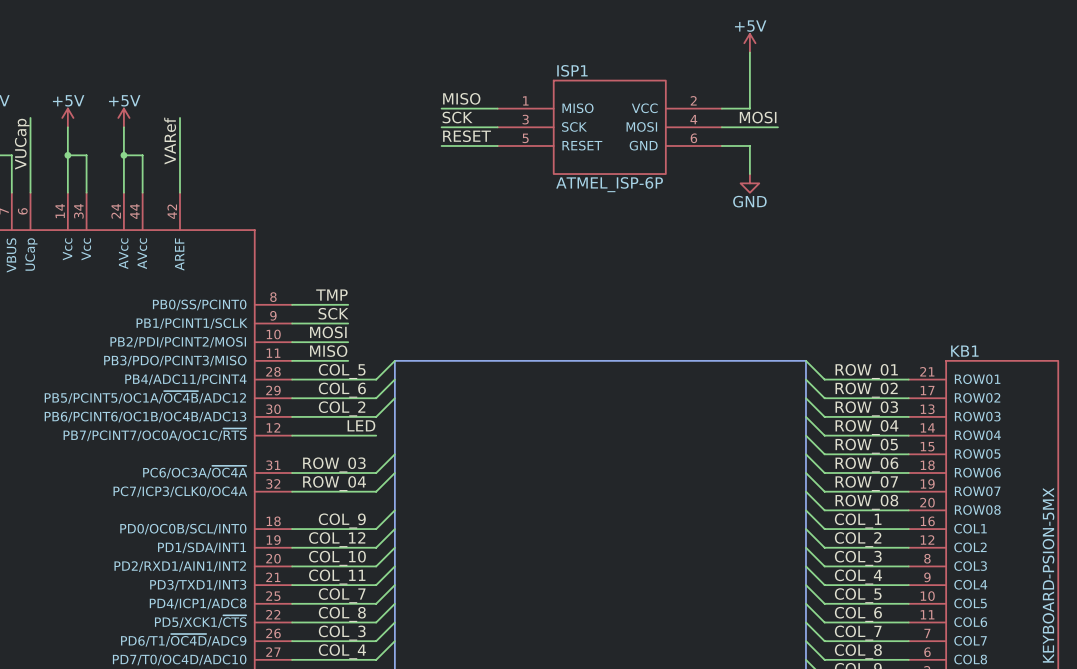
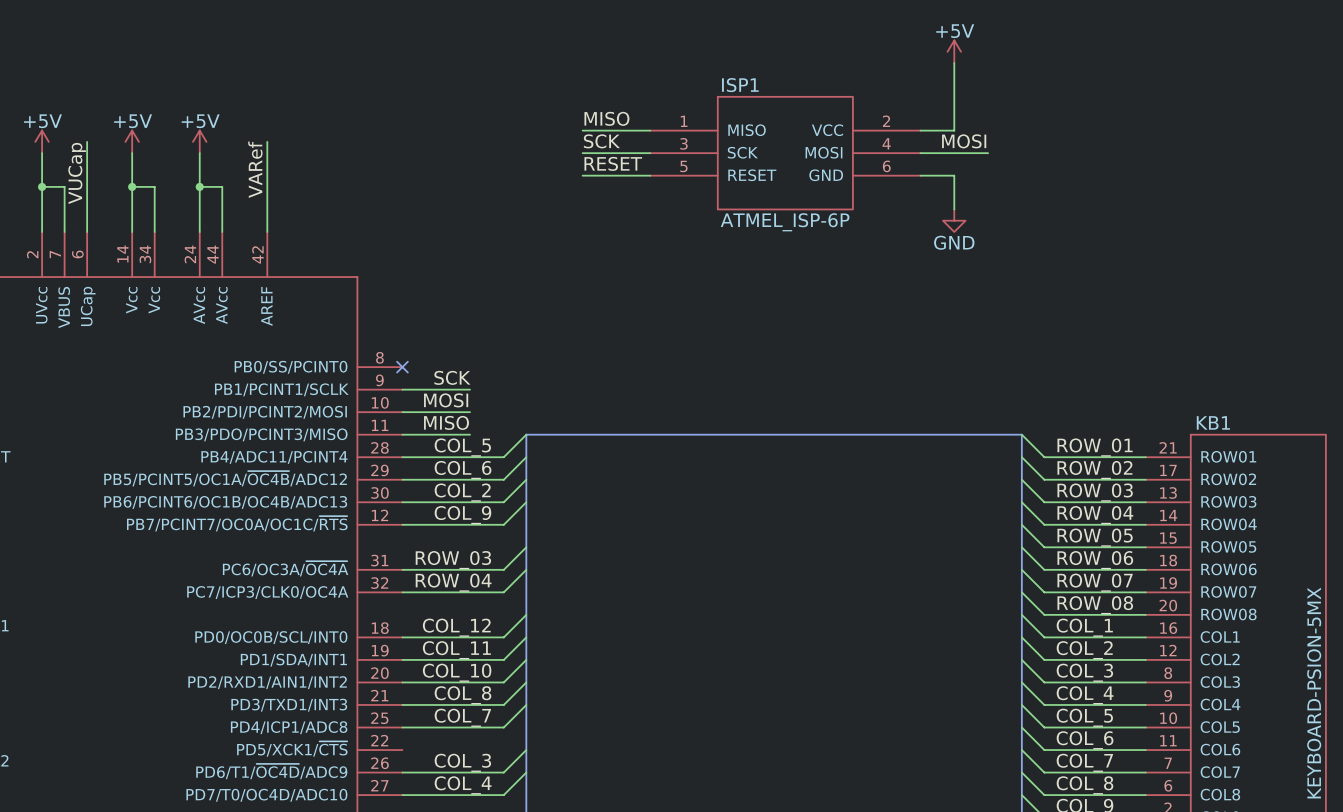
label: TMP (331, 295) -> none
wire: (292, 304) (348, 304) -> none
no-connect mark: none -> (402, 367)
wire: none -> (526, 502) (503, 524)
label: LED (361, 425) -> none
label: none -> COL_9 (462, 515)
label: COL_9 (342, 520) -> COL_12 (456, 627)
label: COL_12 (337, 539) -> COL_11 (456, 650)
label: COL_11 (337, 577) -> COL_8 (462, 695)
wire: (394, 603) (376, 622) (292, 622) -> none
label: COL_8 (342, 614) -> none

